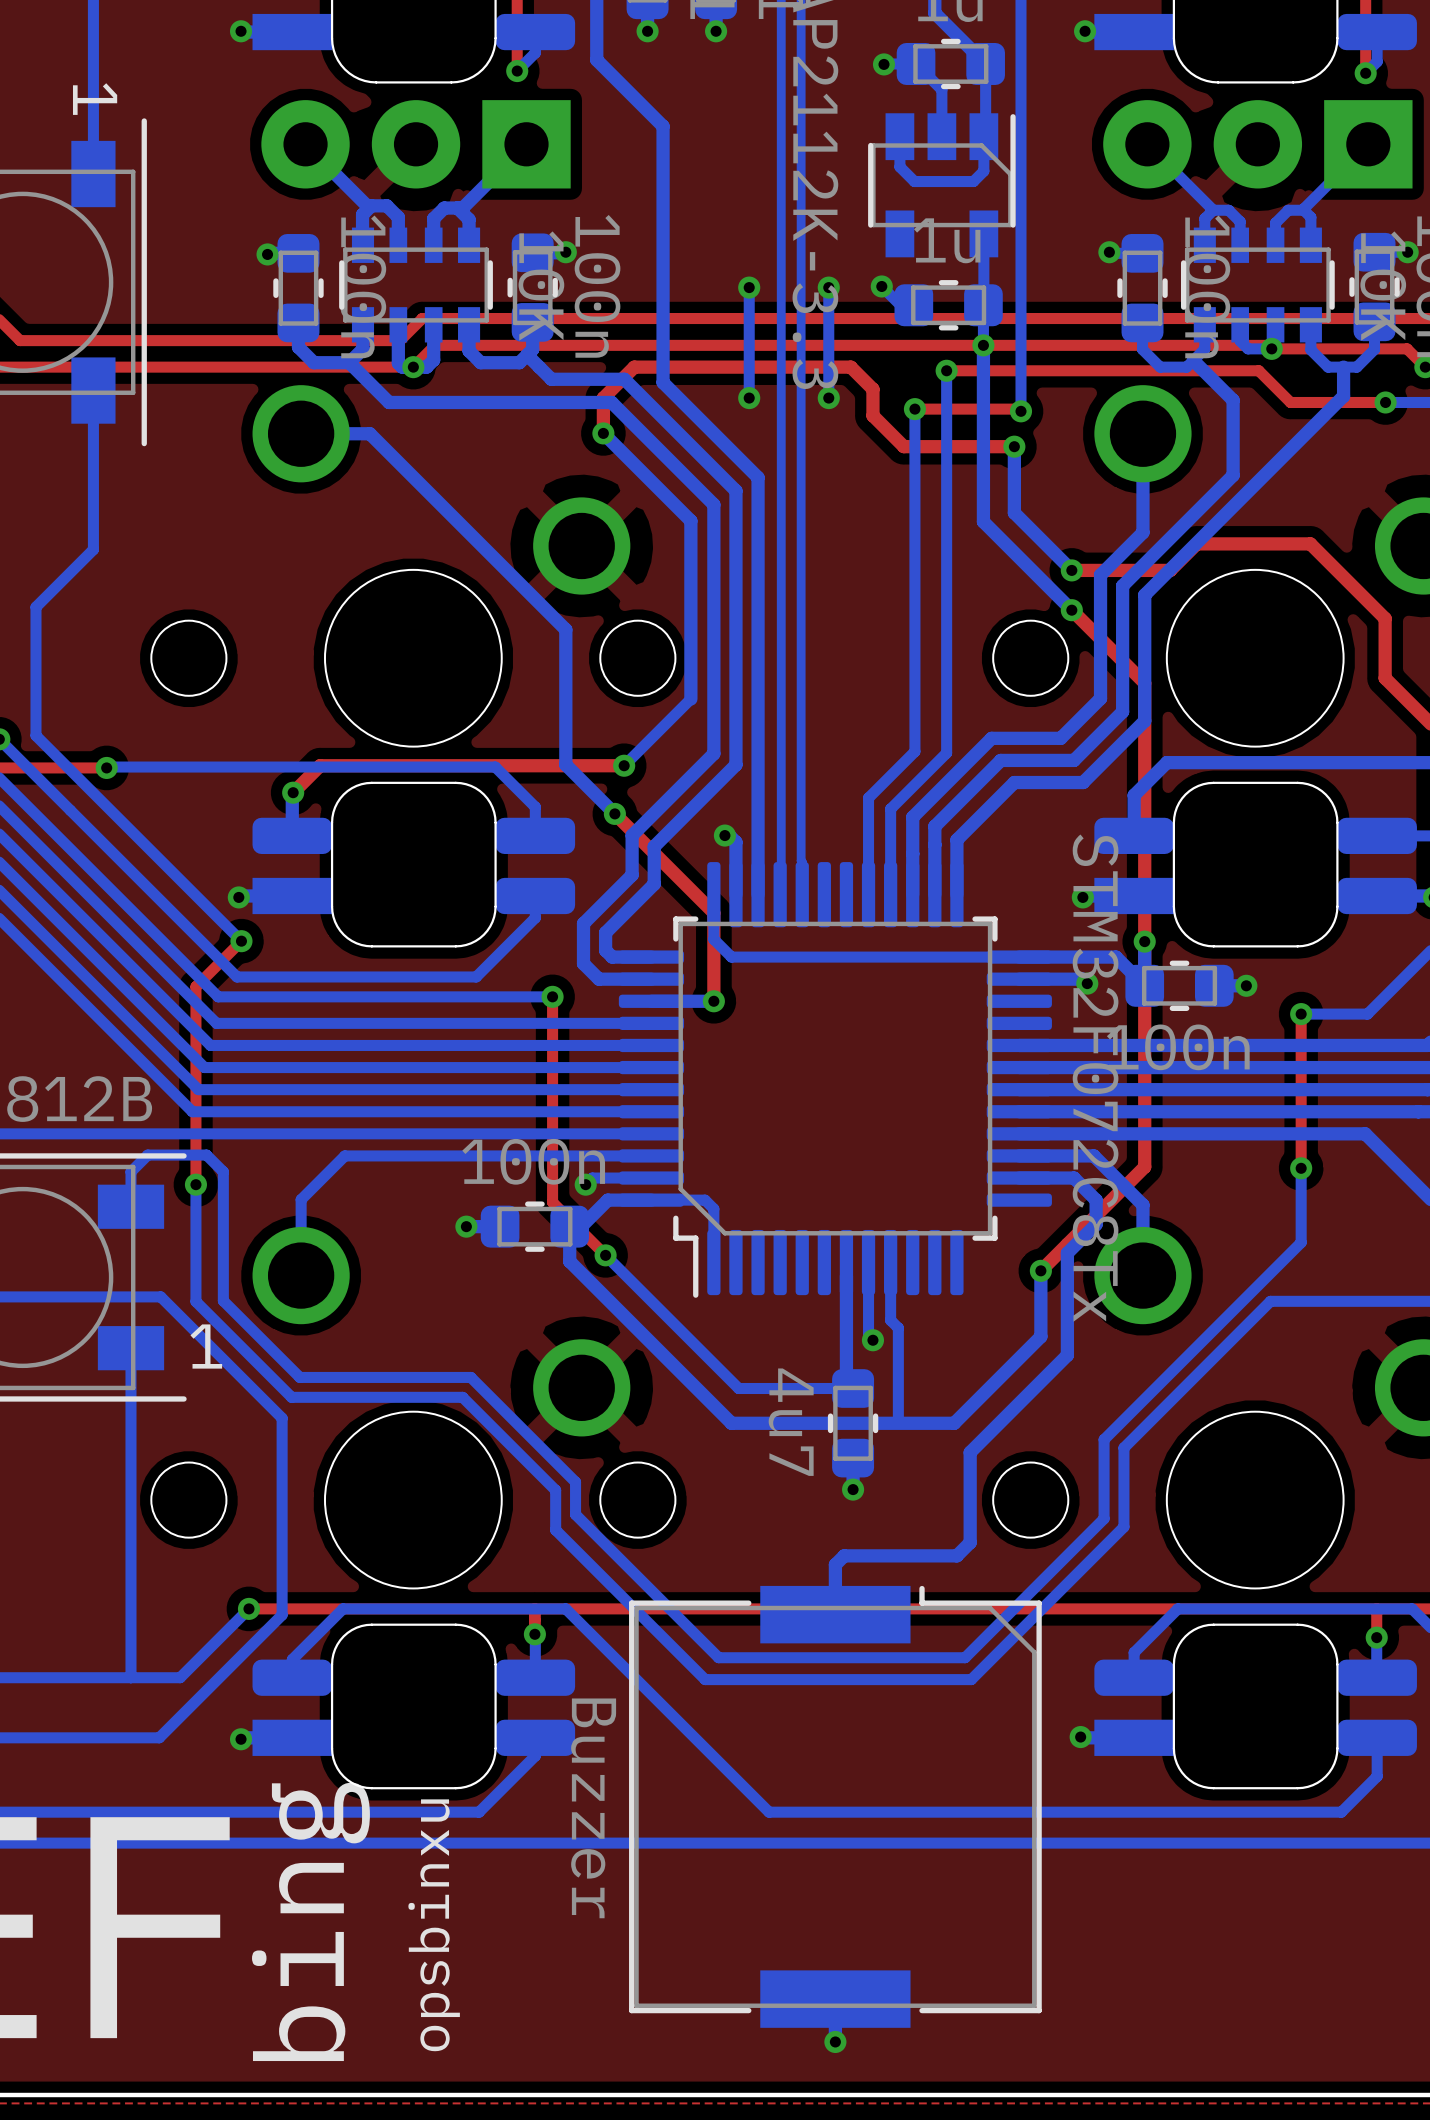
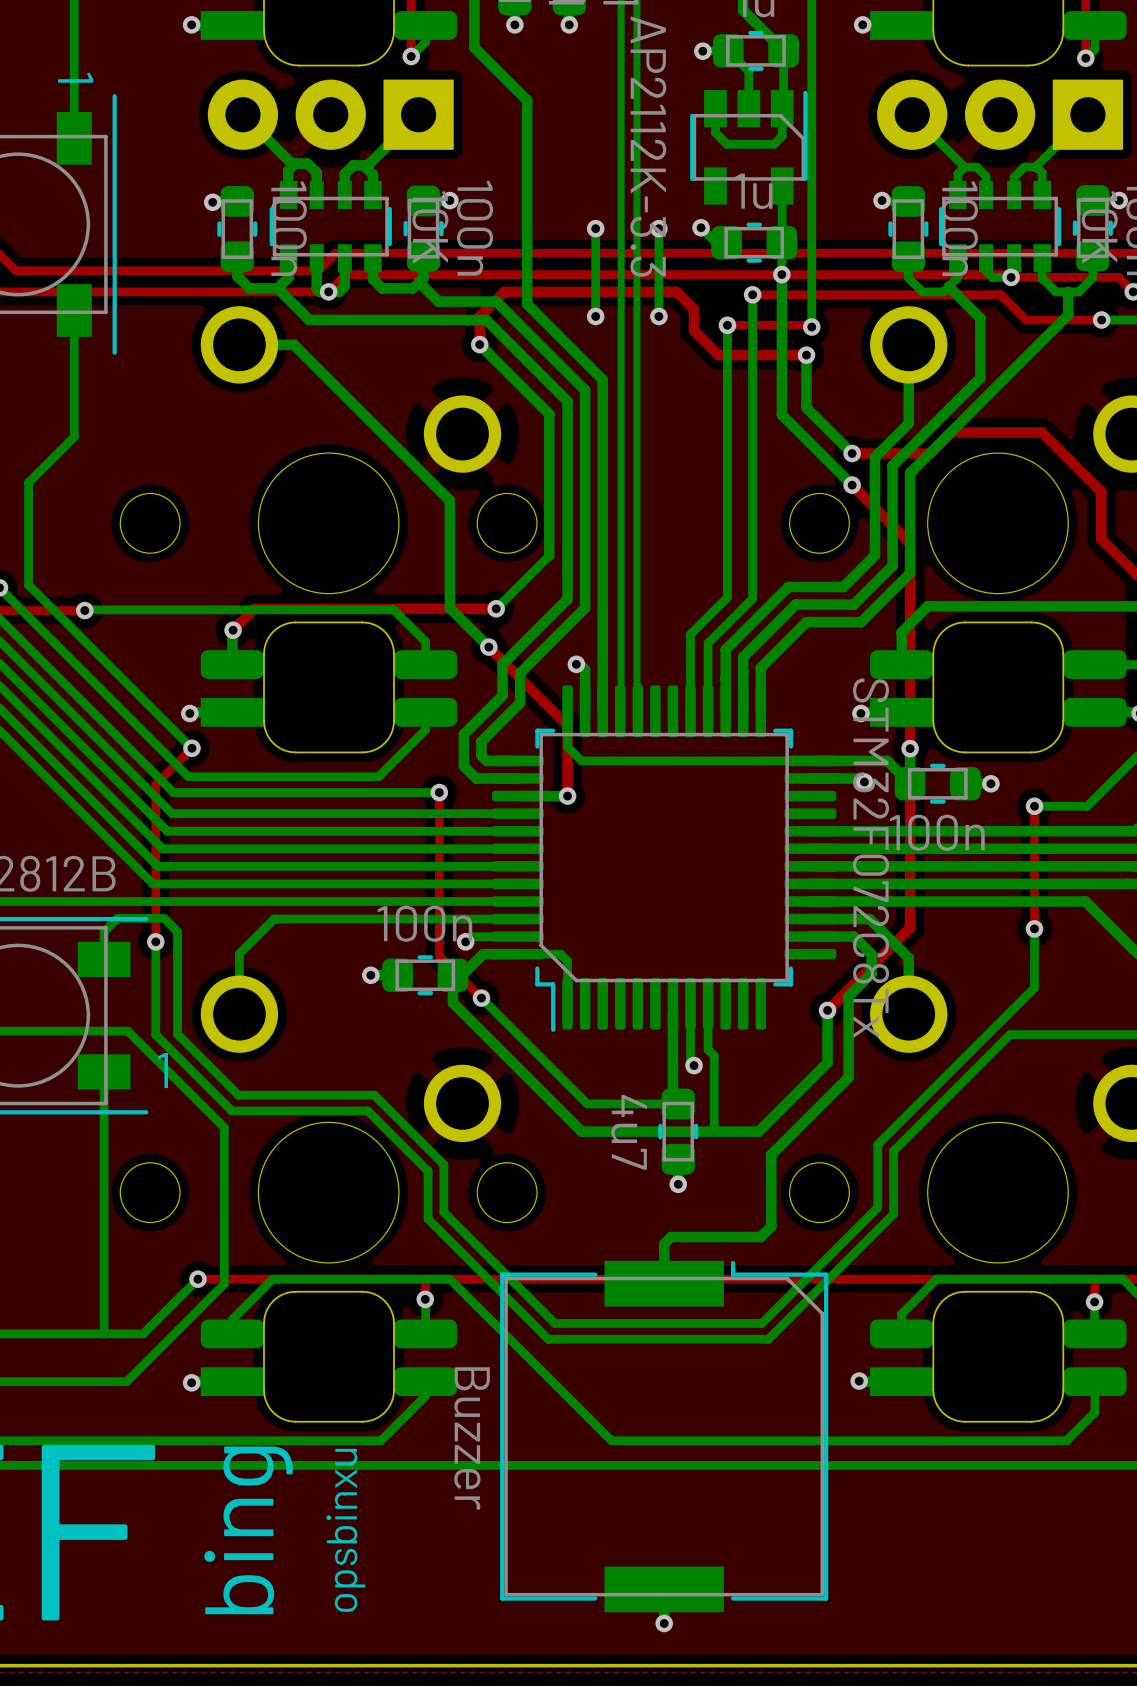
bottom track: (558, 1464) (575, 1482) (575, 1514) (718, 1657) (965, 1657) -> (443, 1164) (443, 1212) (554, 1323) (761, 1323) (767, 1317)
bottom track: (538, 1473) (555, 1490) (555, 1530) (705, 1679) (971, 1679) -> (428, 1171) (428, 1218) (548, 1339) (768, 1339) (772, 1335)

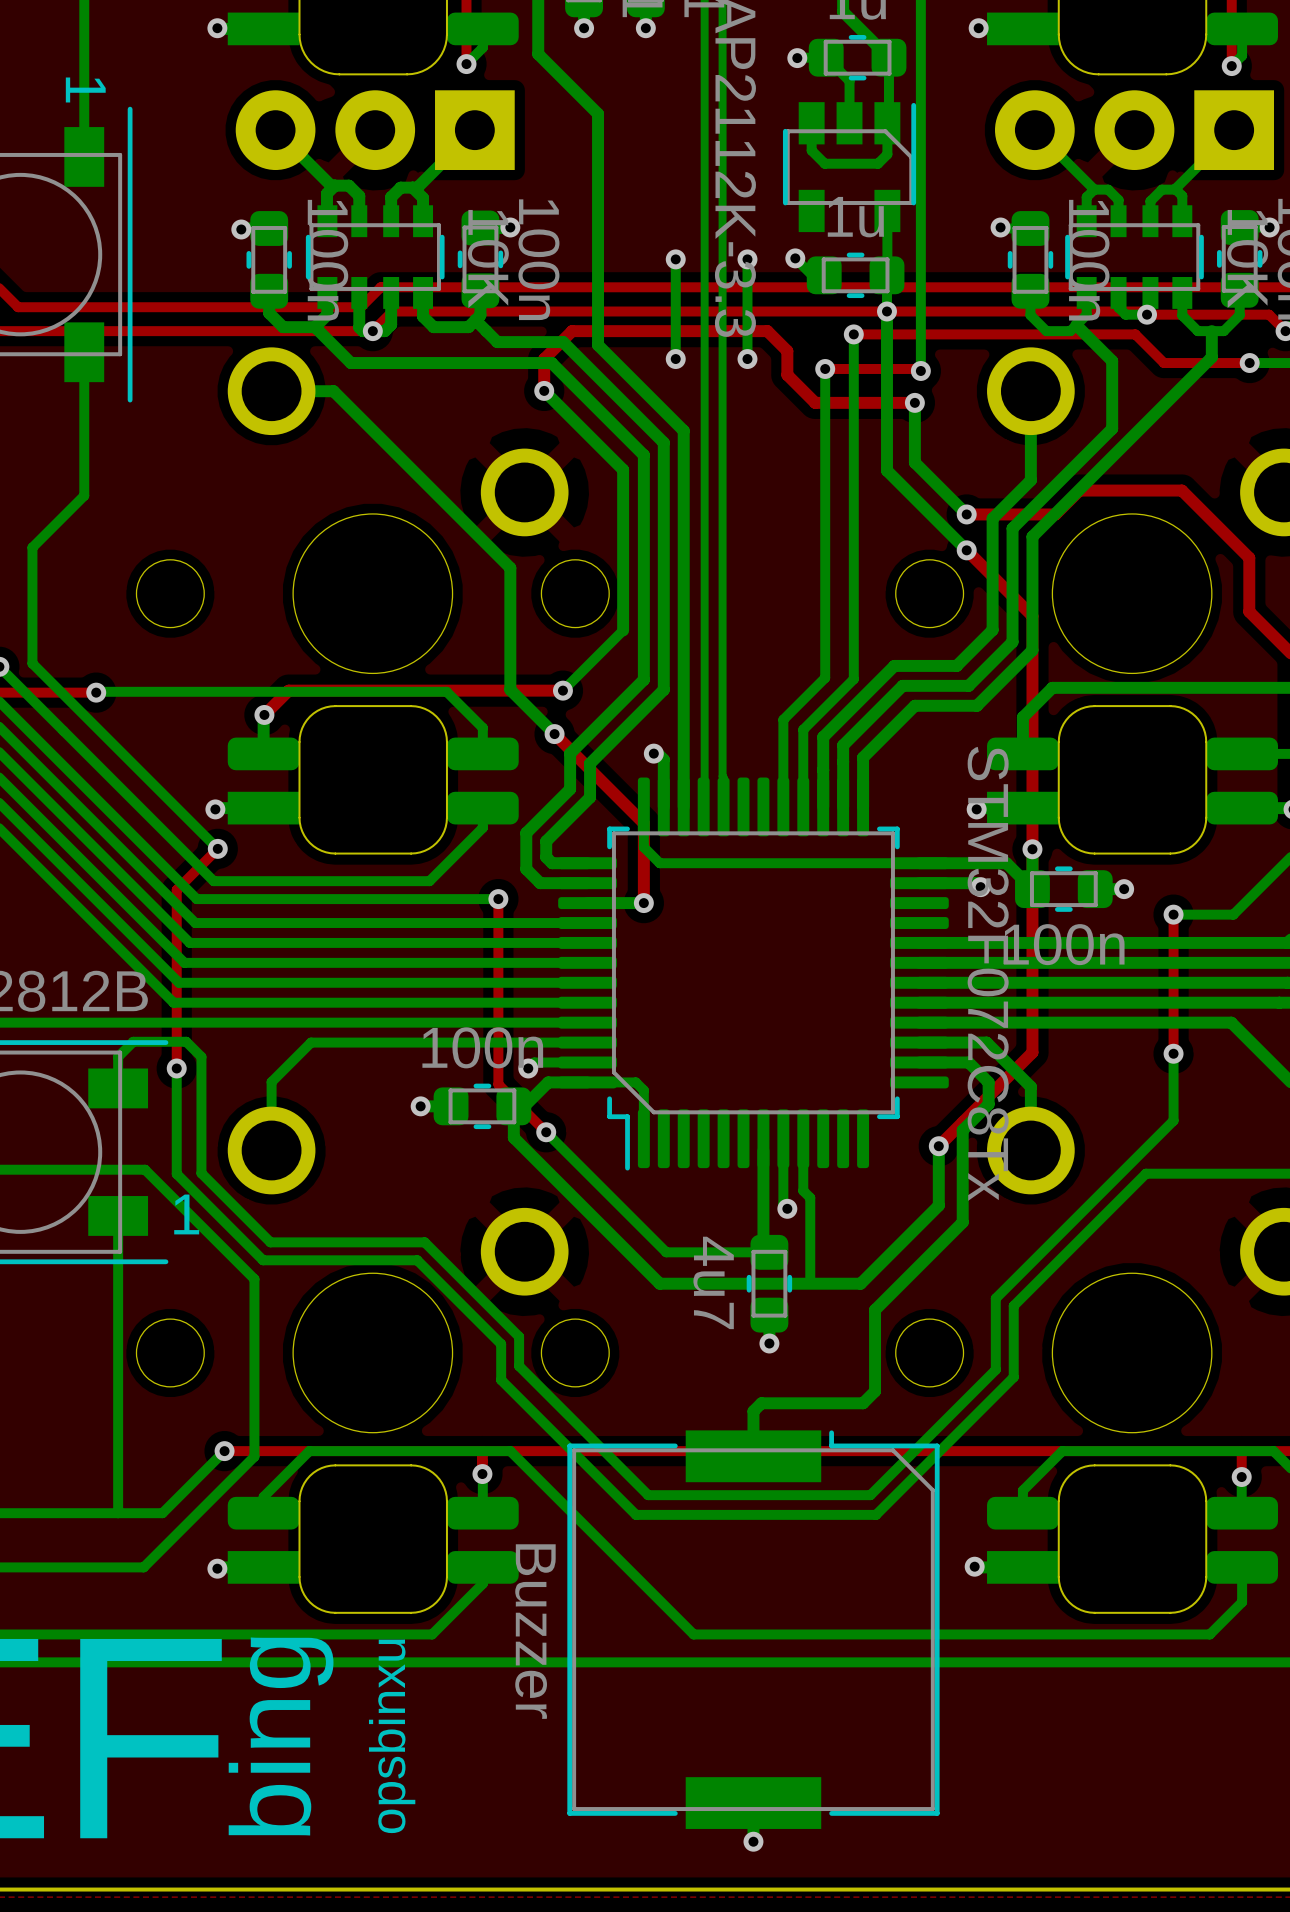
bottom track: (443, 1164) (443, 1212) (554, 1323) (761, 1323) (767, 1317) -> (503, 1321) (519, 1336) (519, 1366) (648, 1495) (870, 1495)
bottom track: (428, 1171) (428, 1218) (548, 1339) (768, 1339) (772, 1335) -> (485, 1328) (501, 1344) (501, 1380) (636, 1514) (876, 1514)

